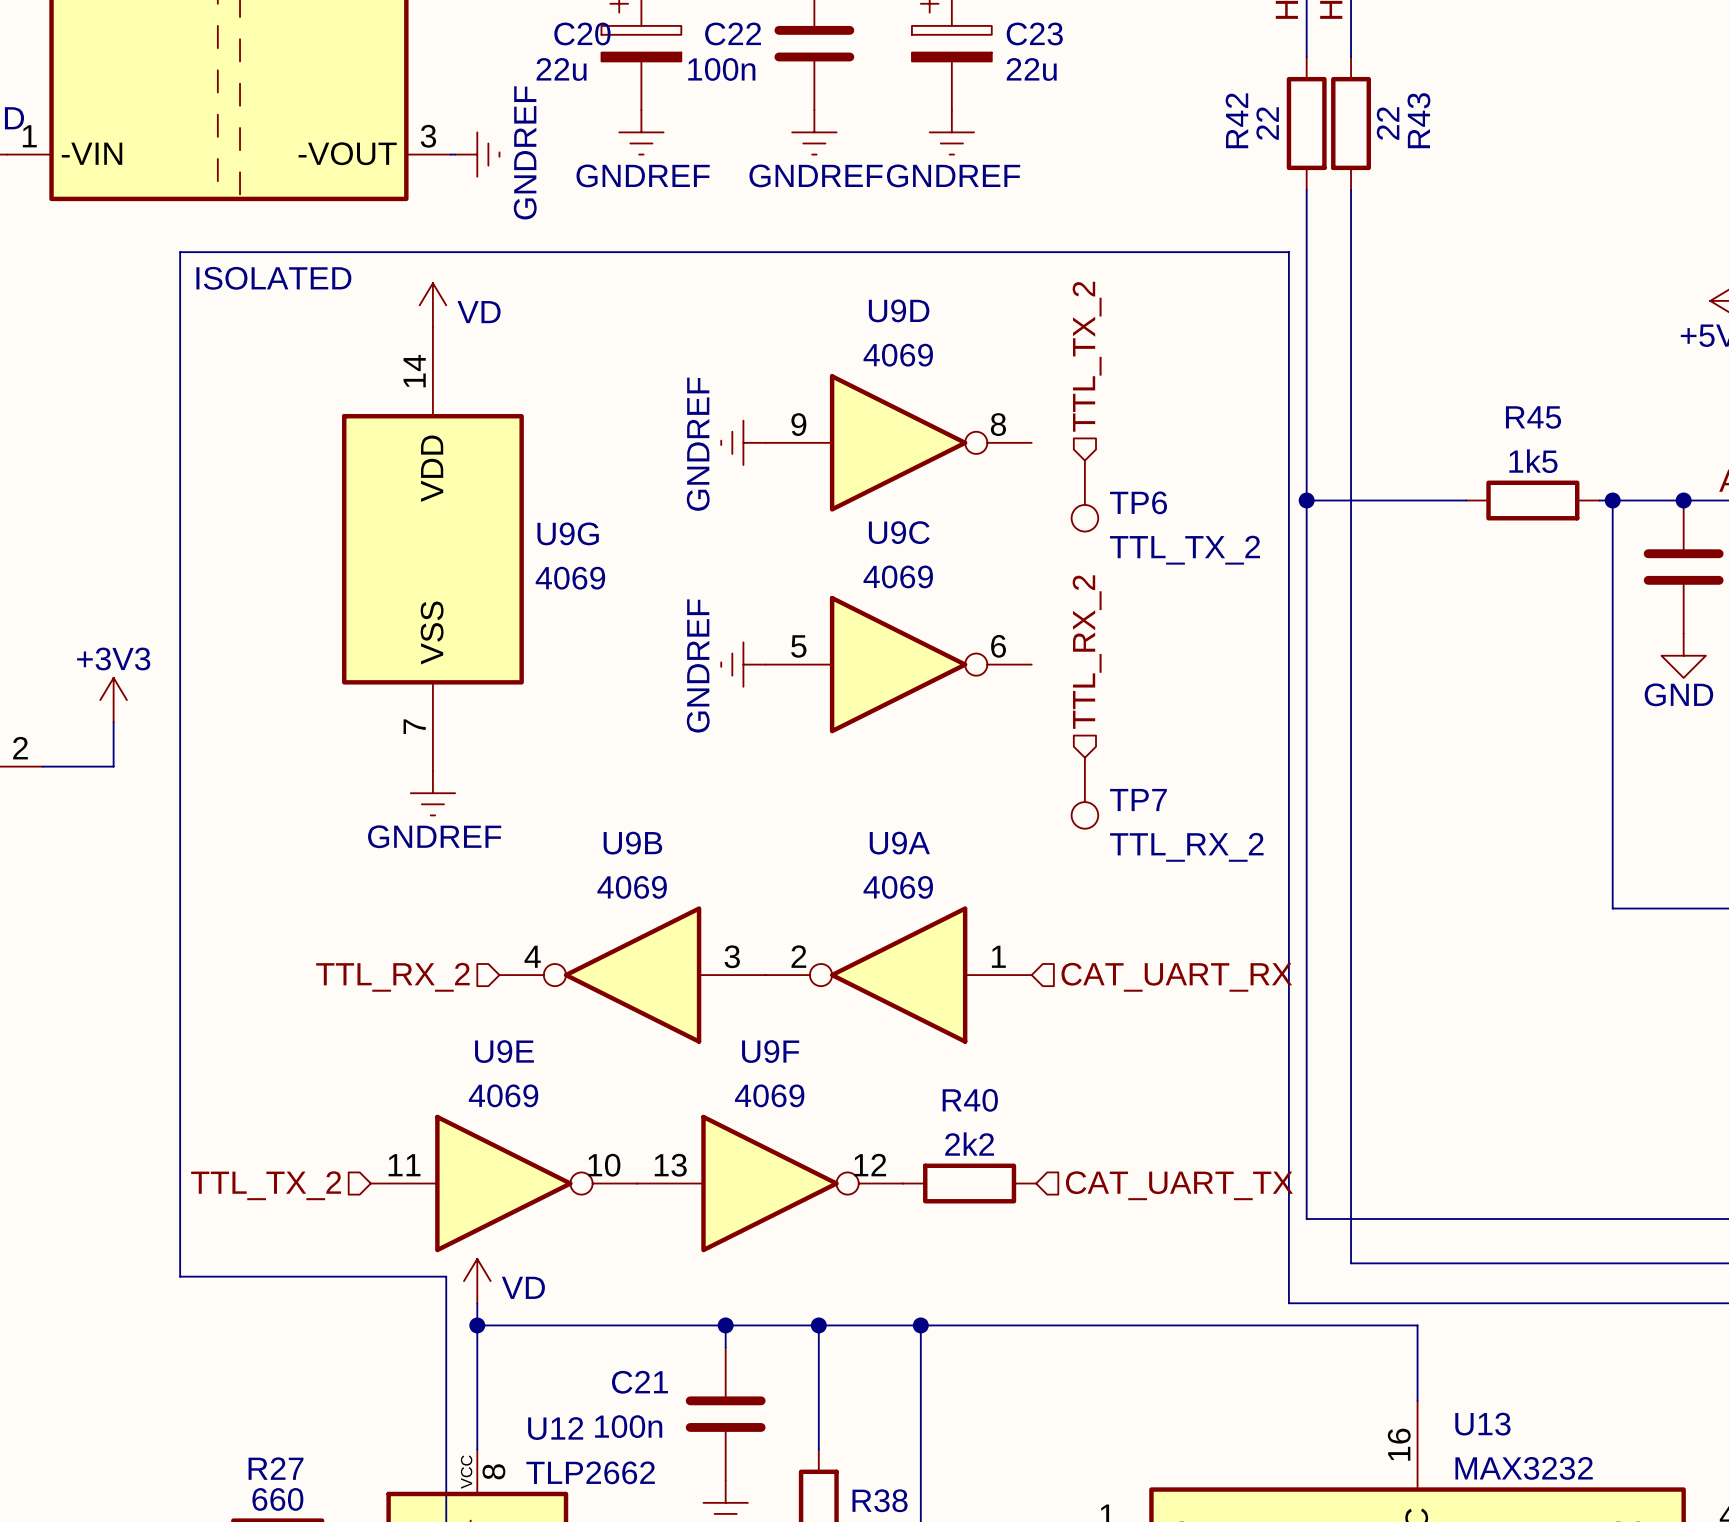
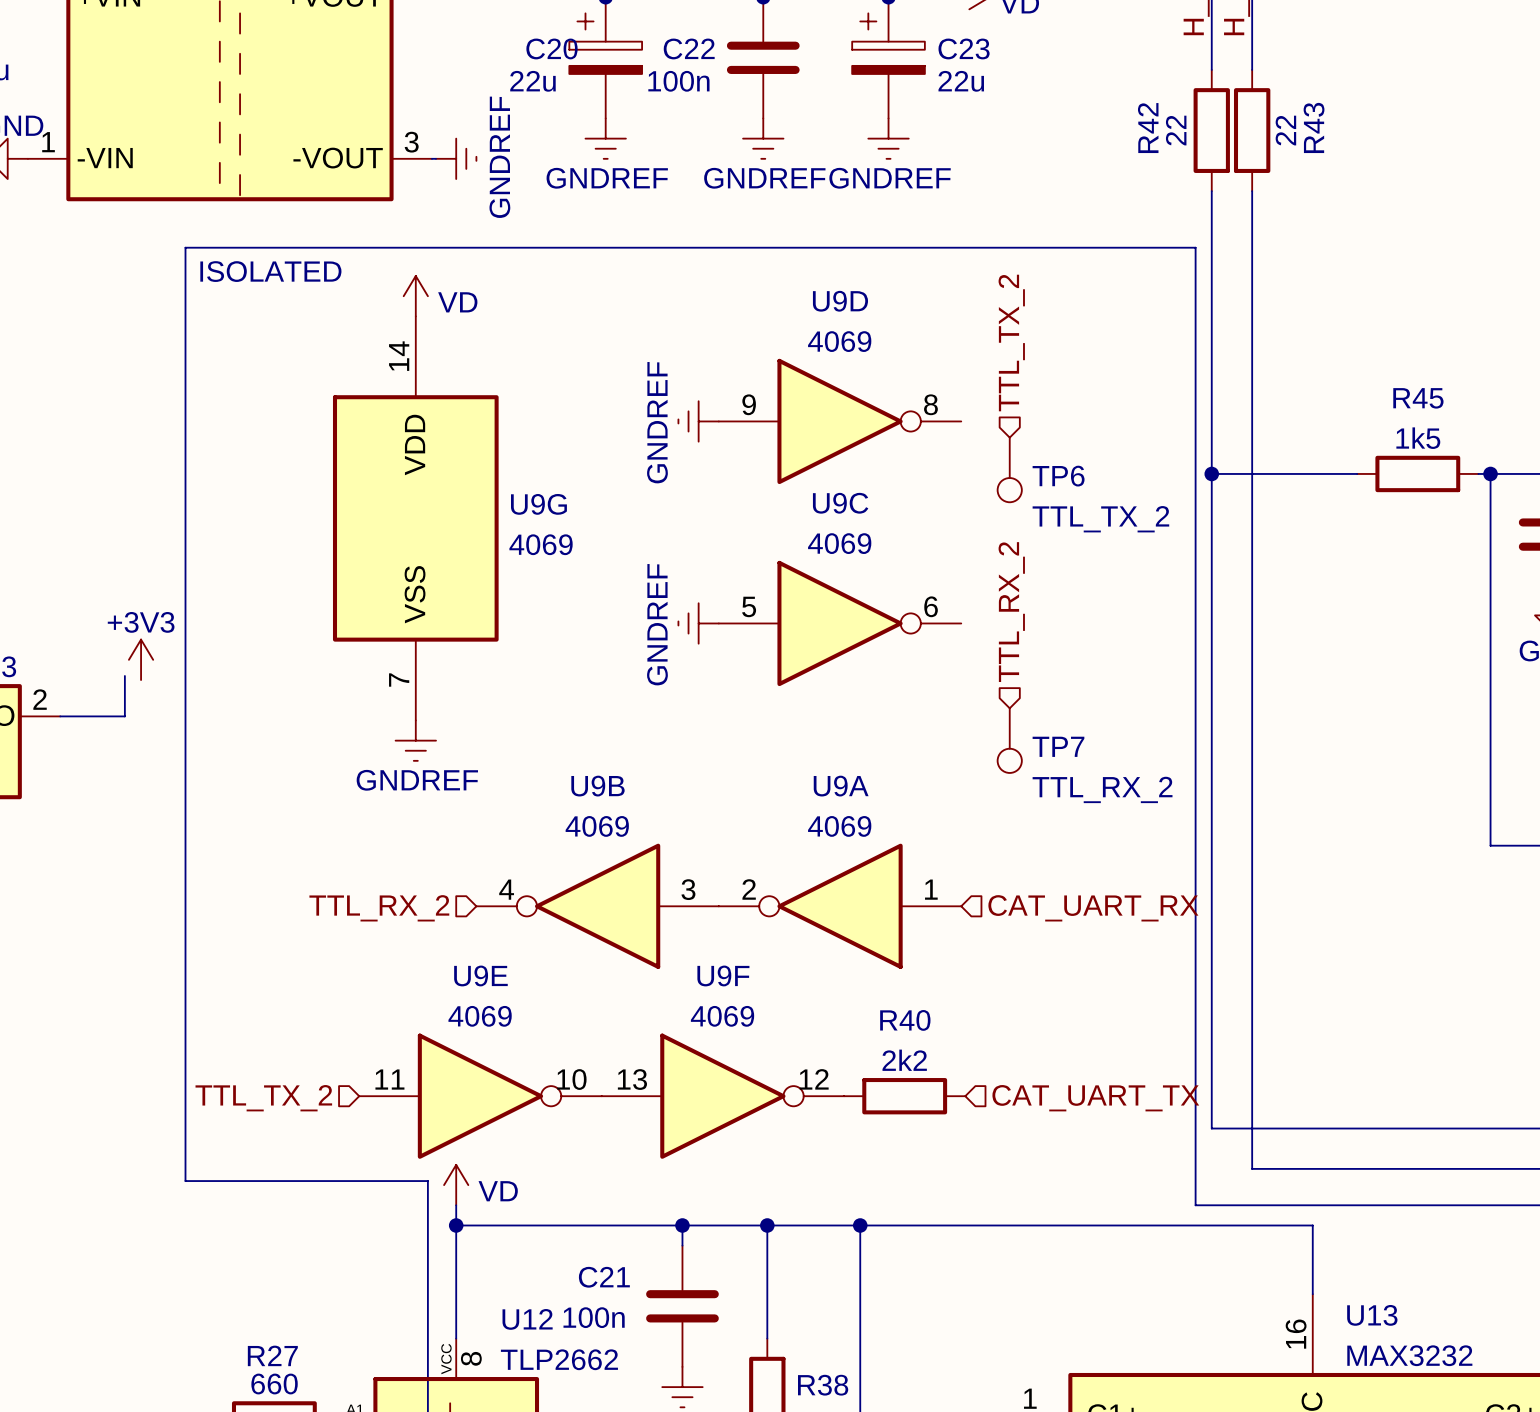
power symbol position: +3V3 (113, 700) -> +3V3 (141, 659)

